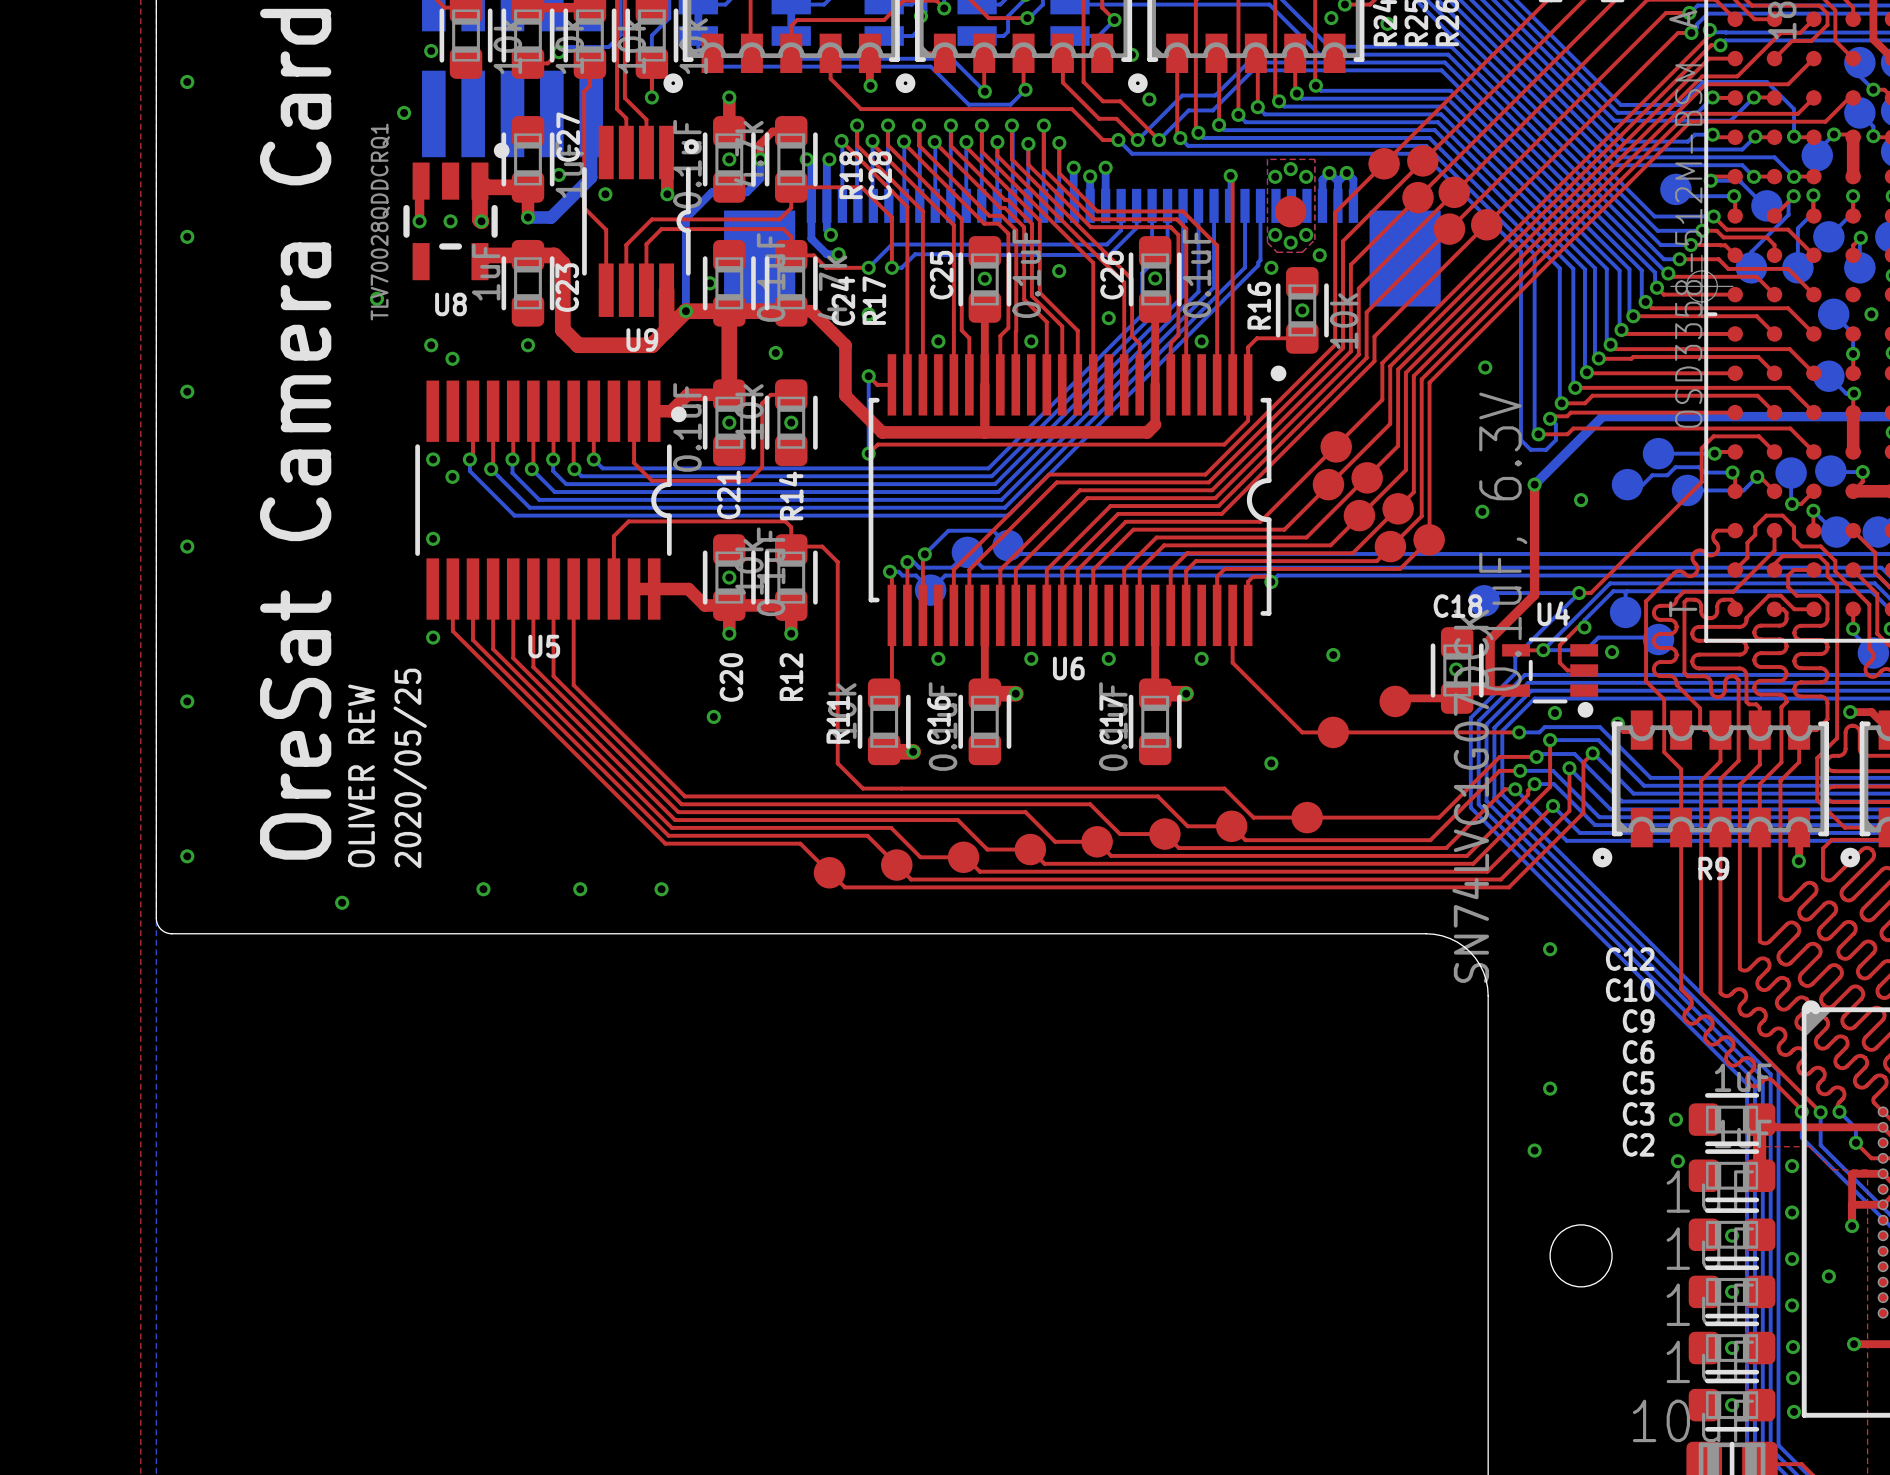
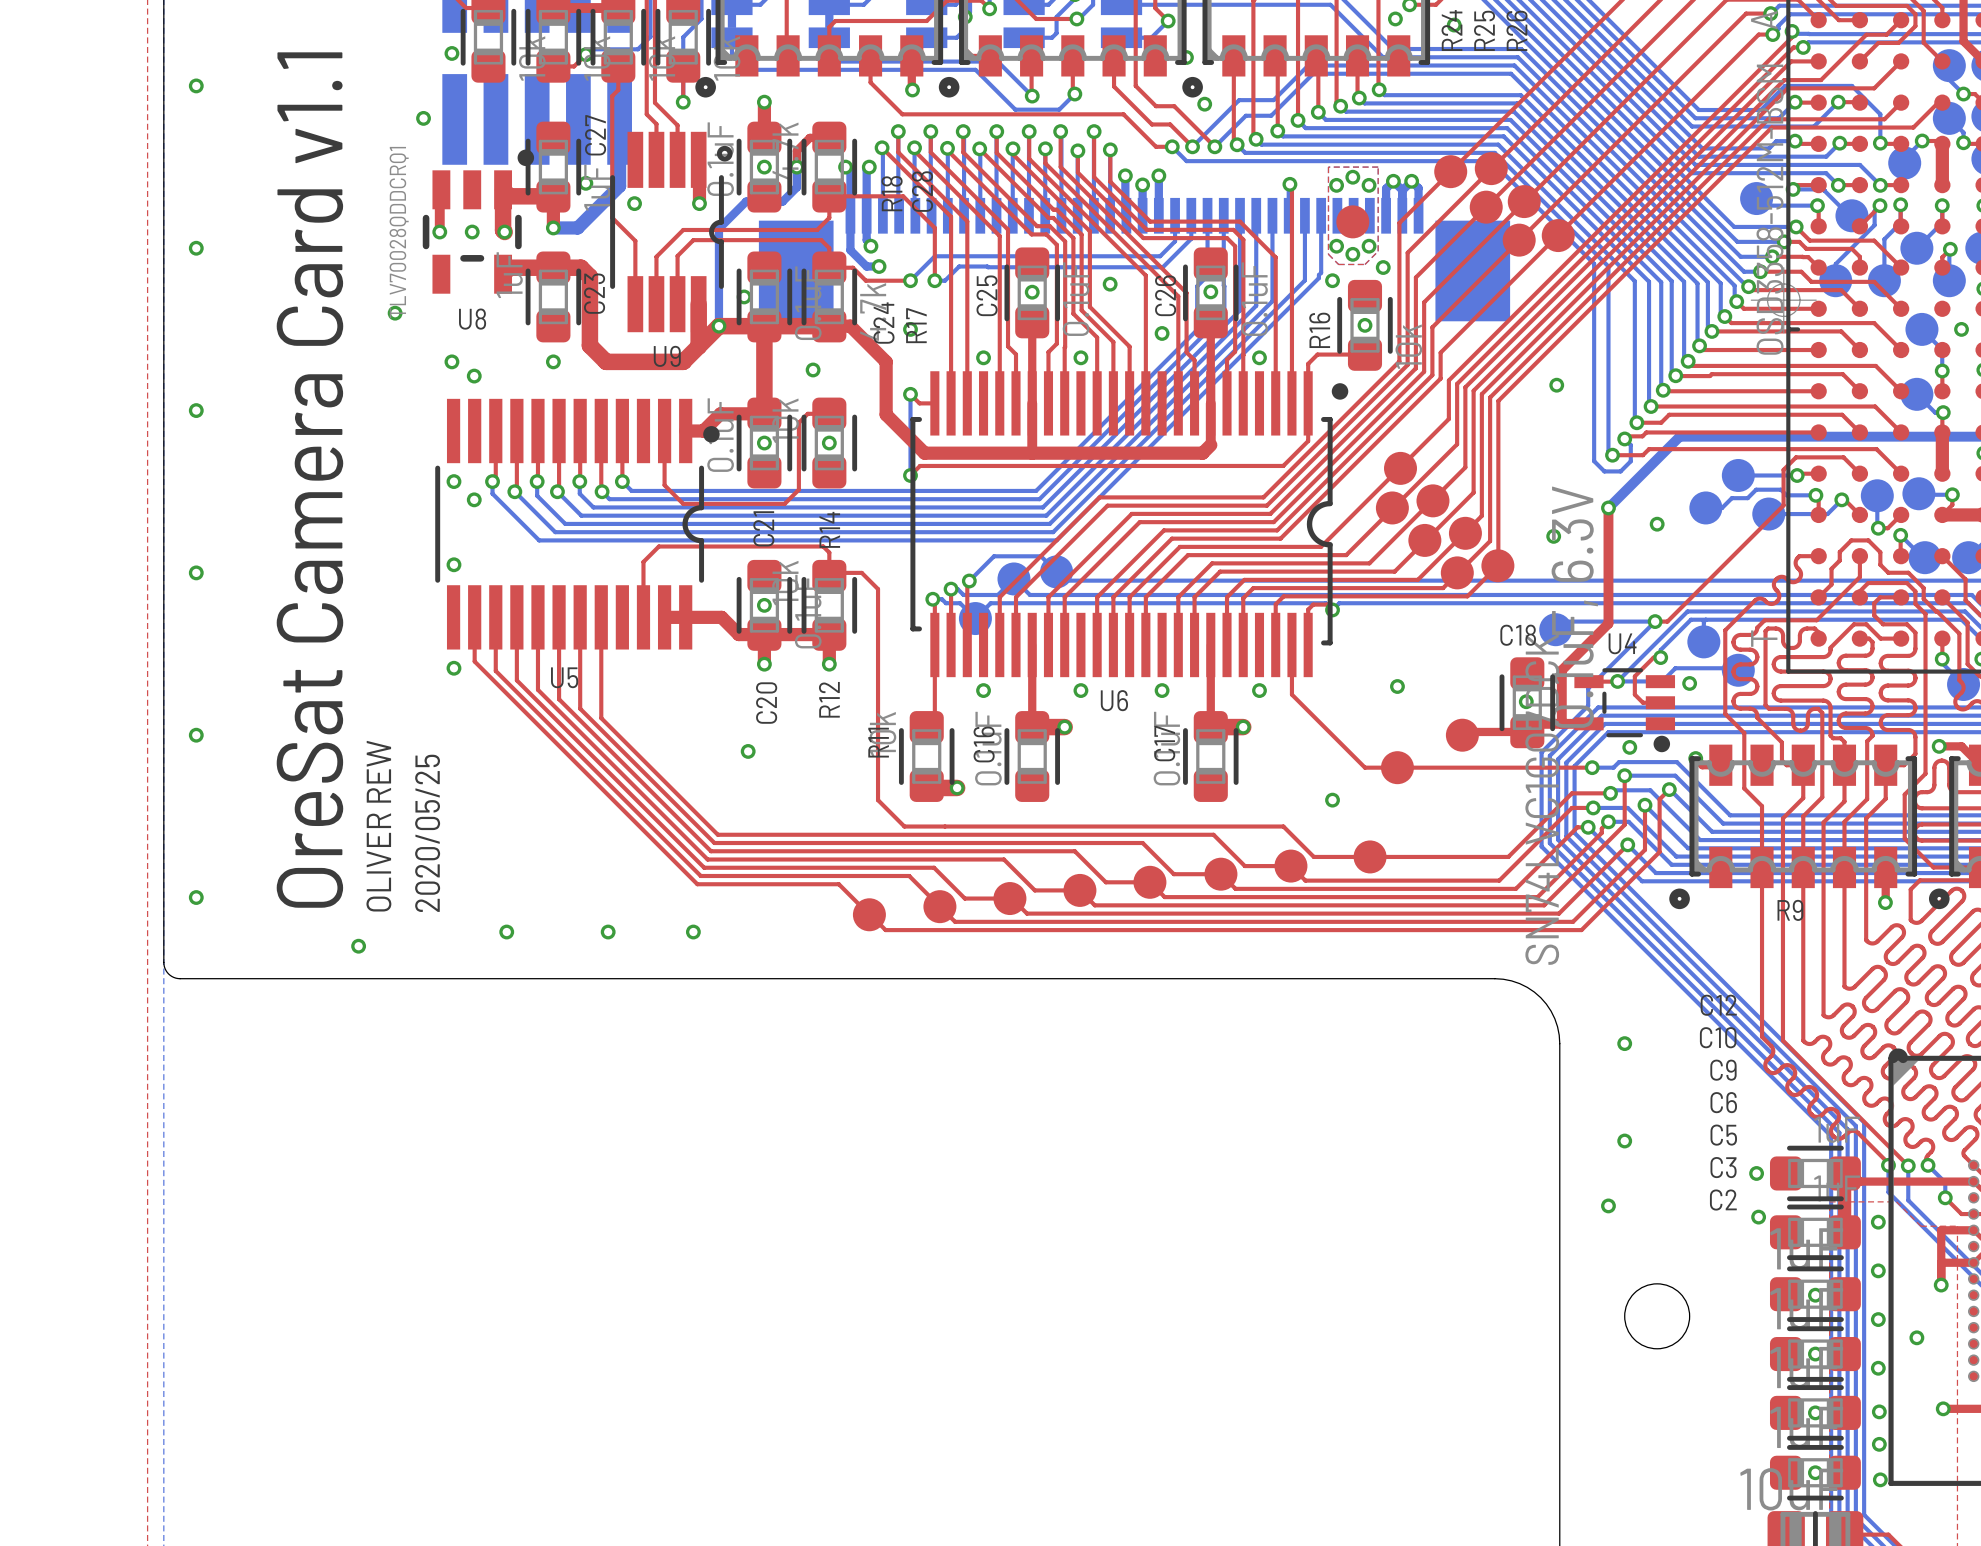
via position: (1550, 949) -> (1624, 1043)

